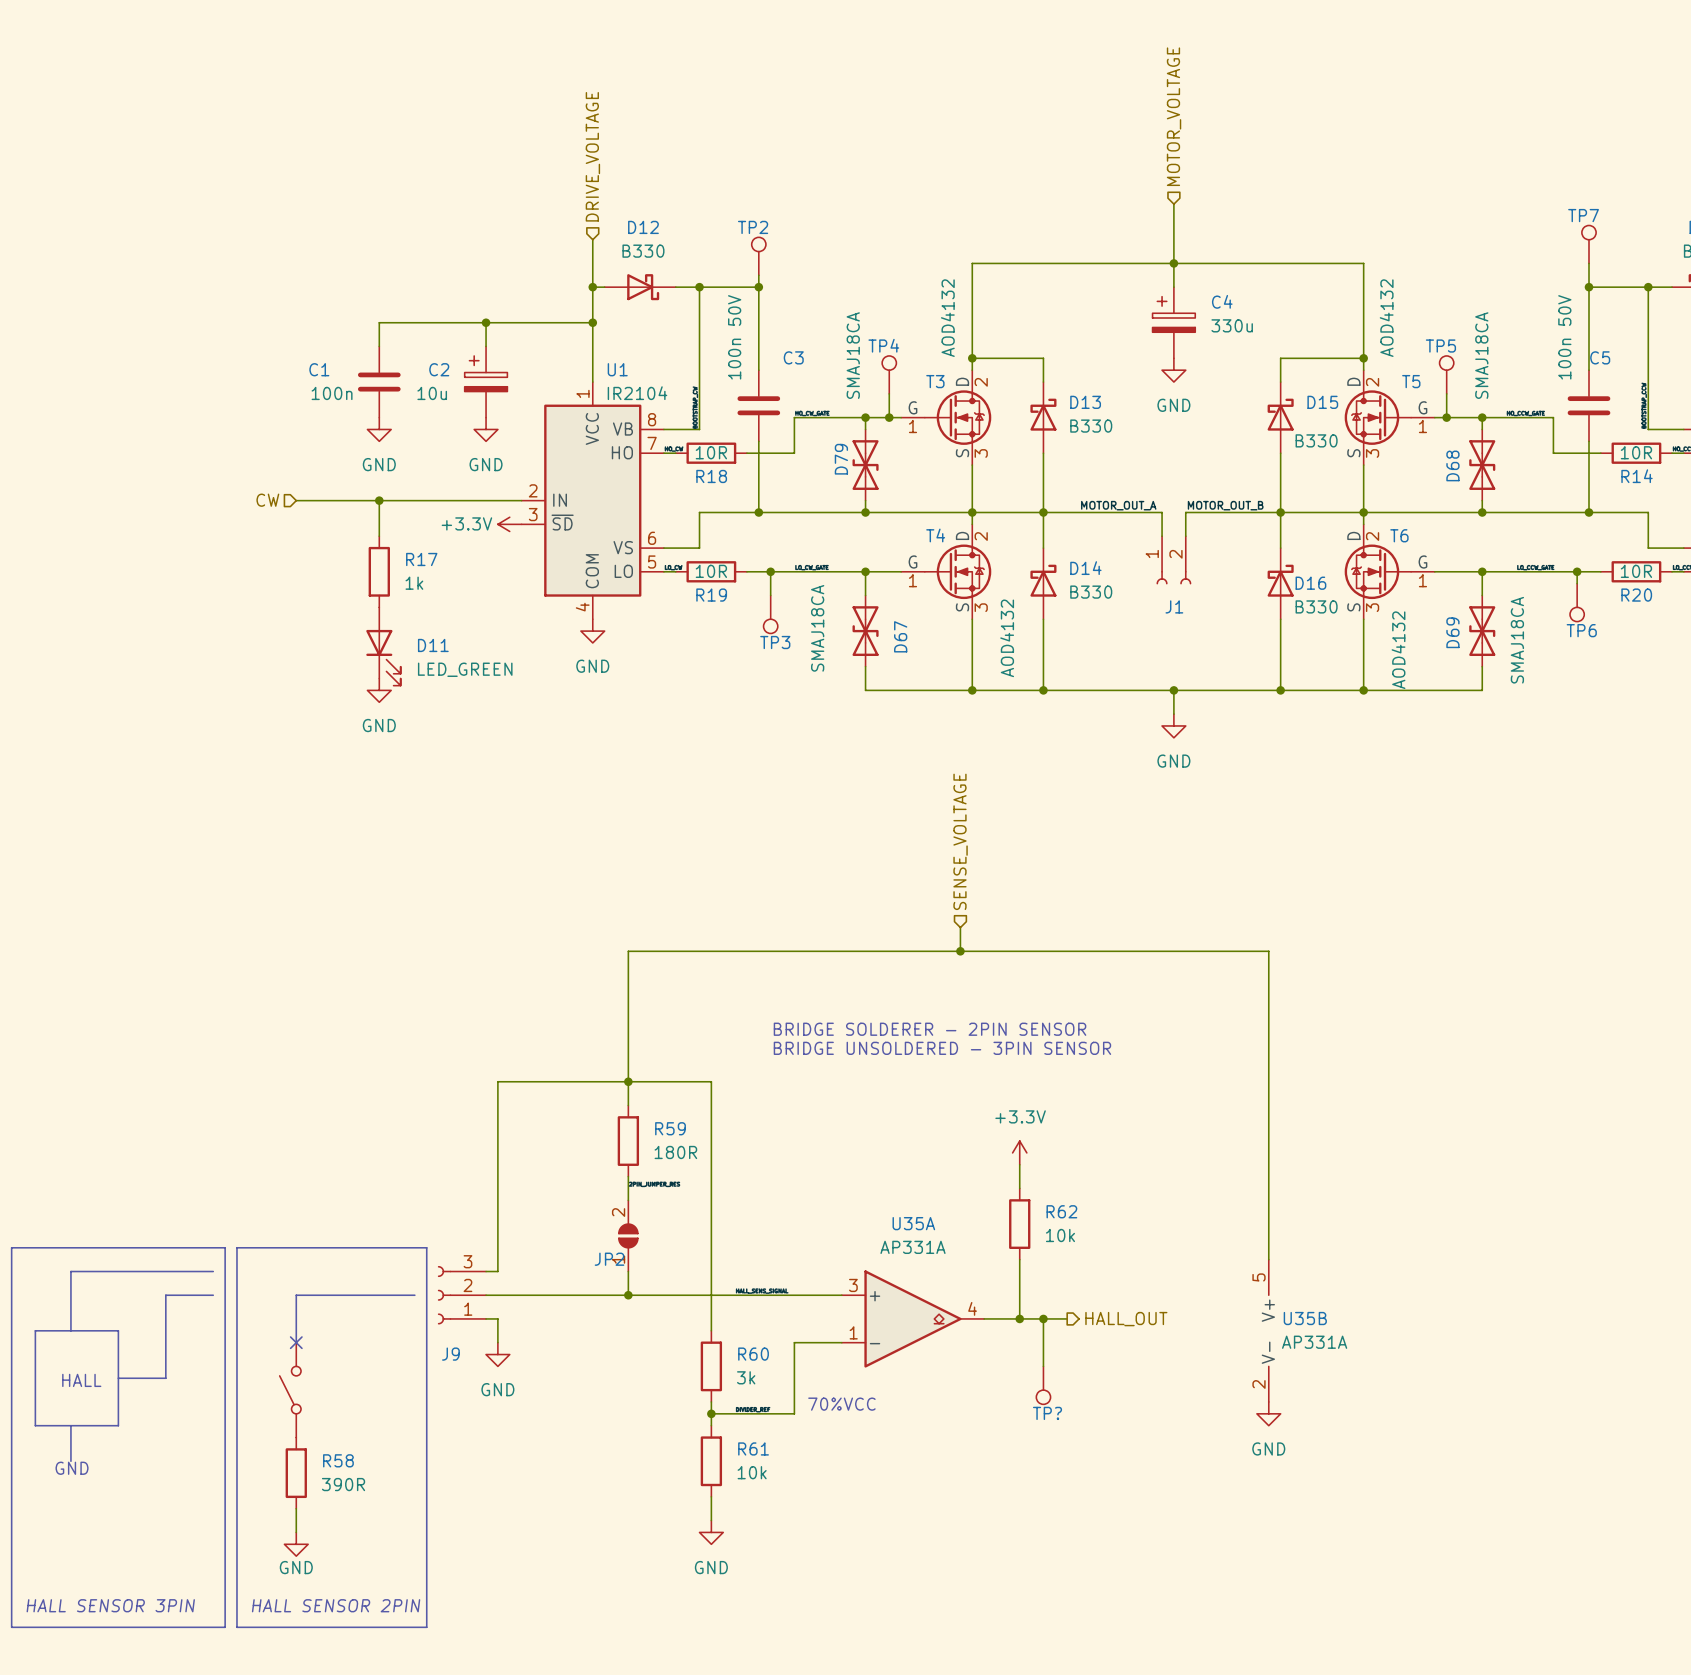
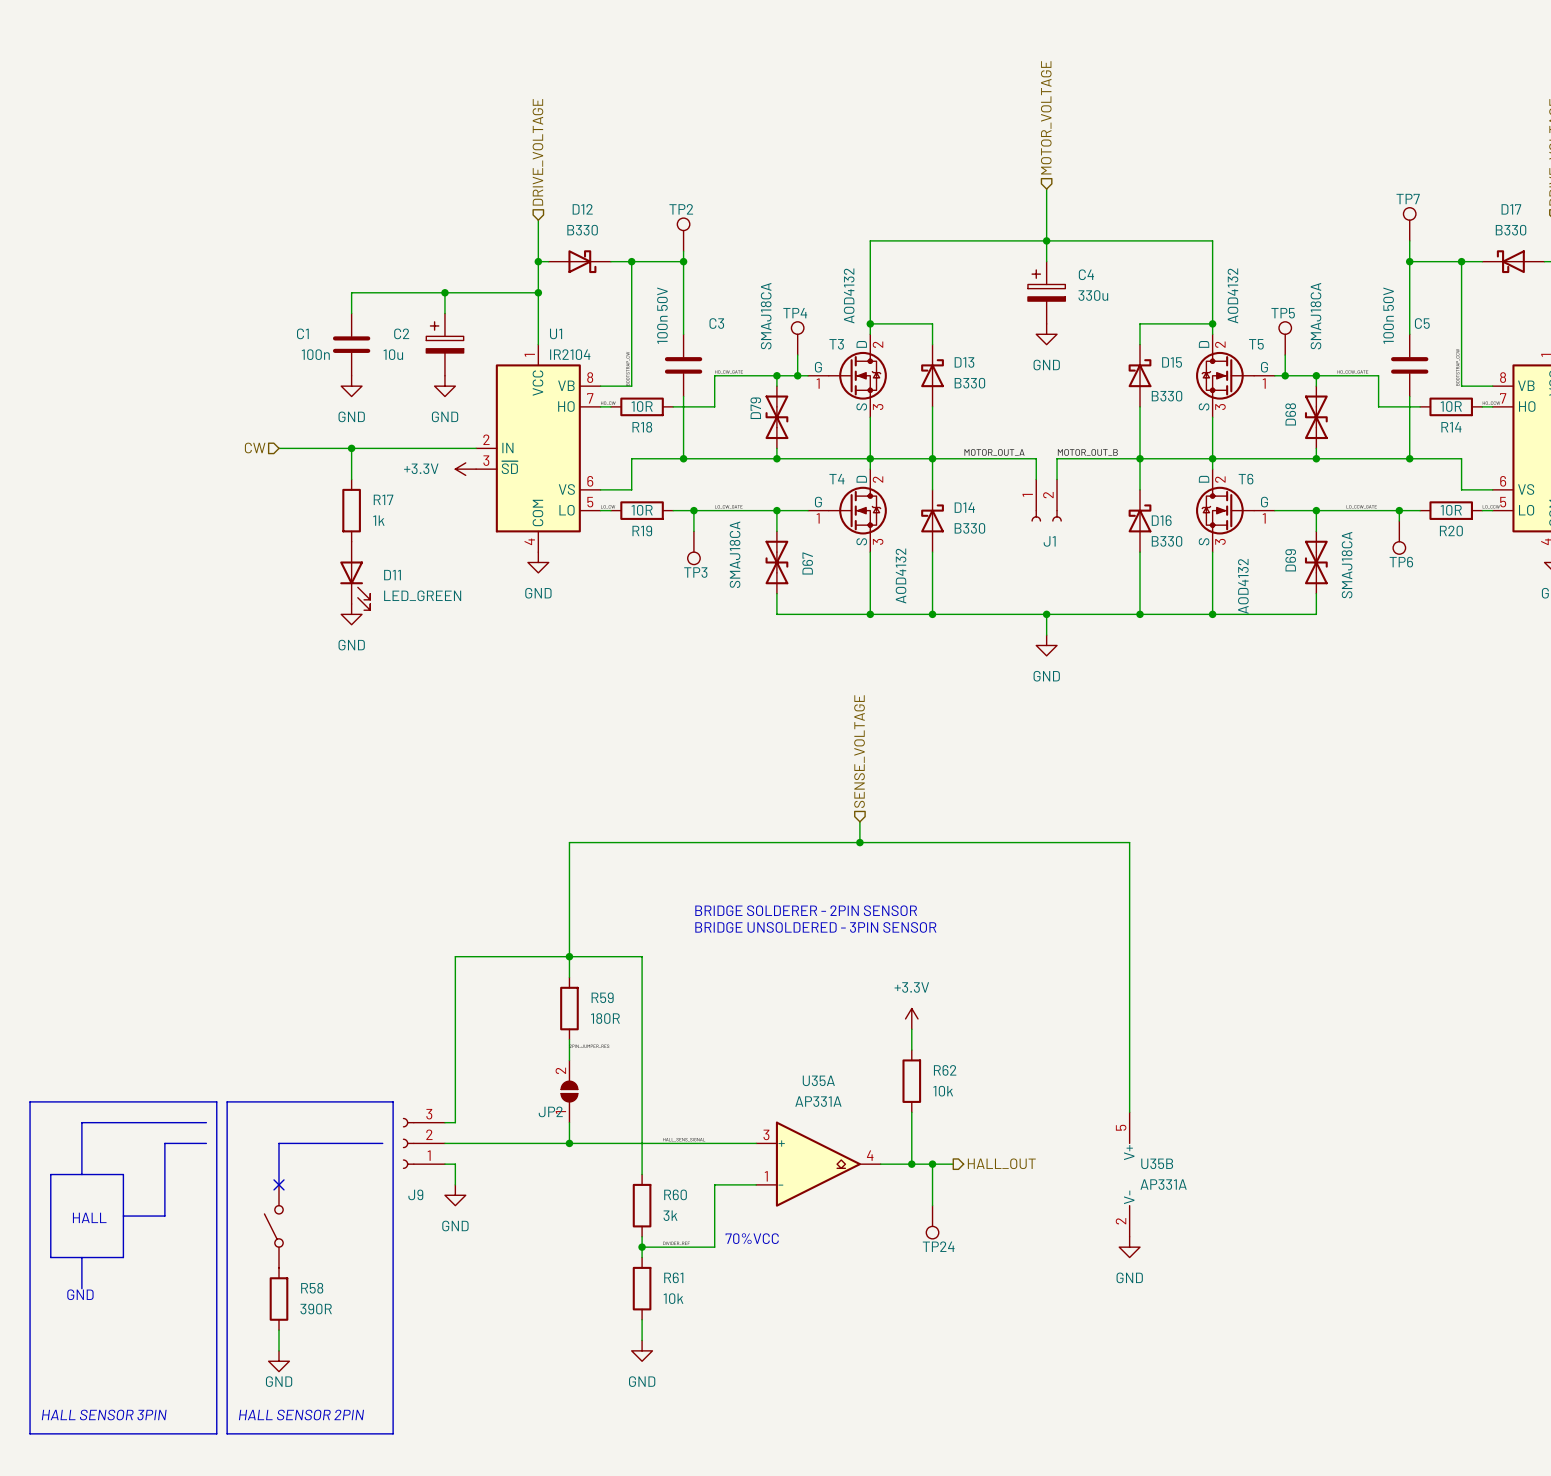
TP? name: TP? (1047, 1413) -> TP24 (938, 1246)

